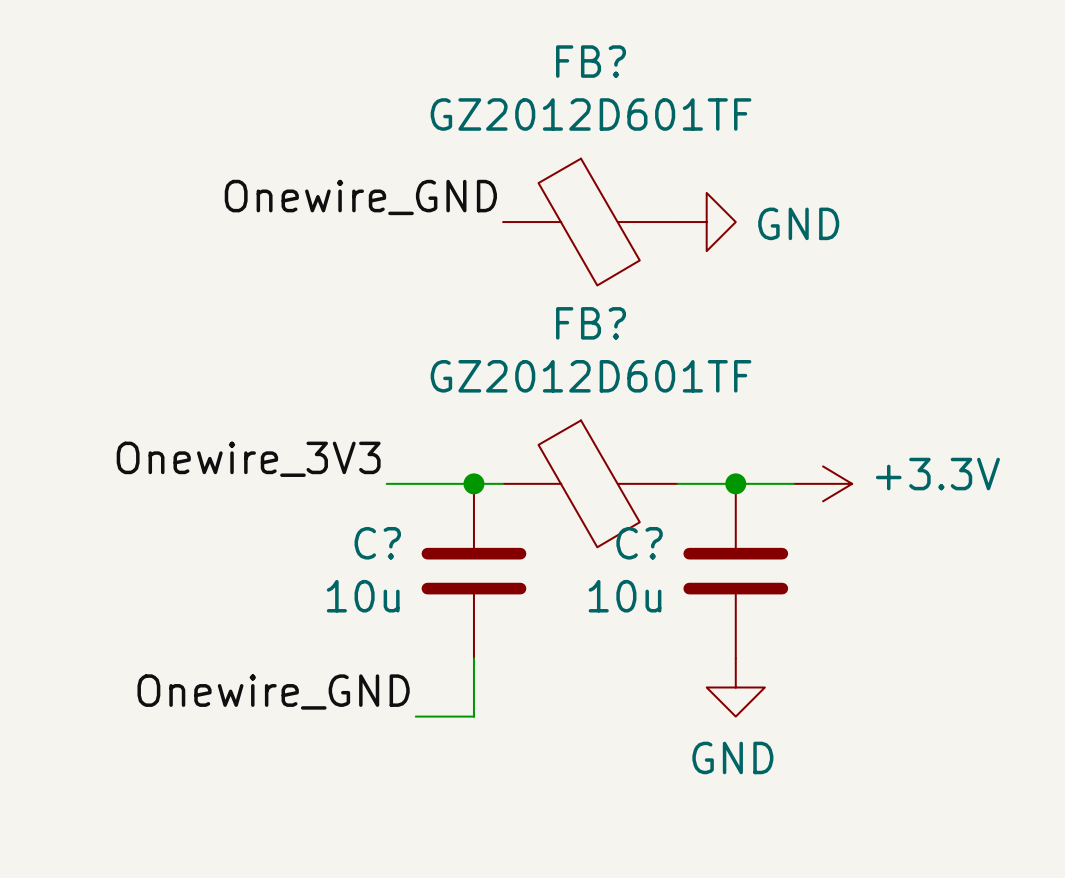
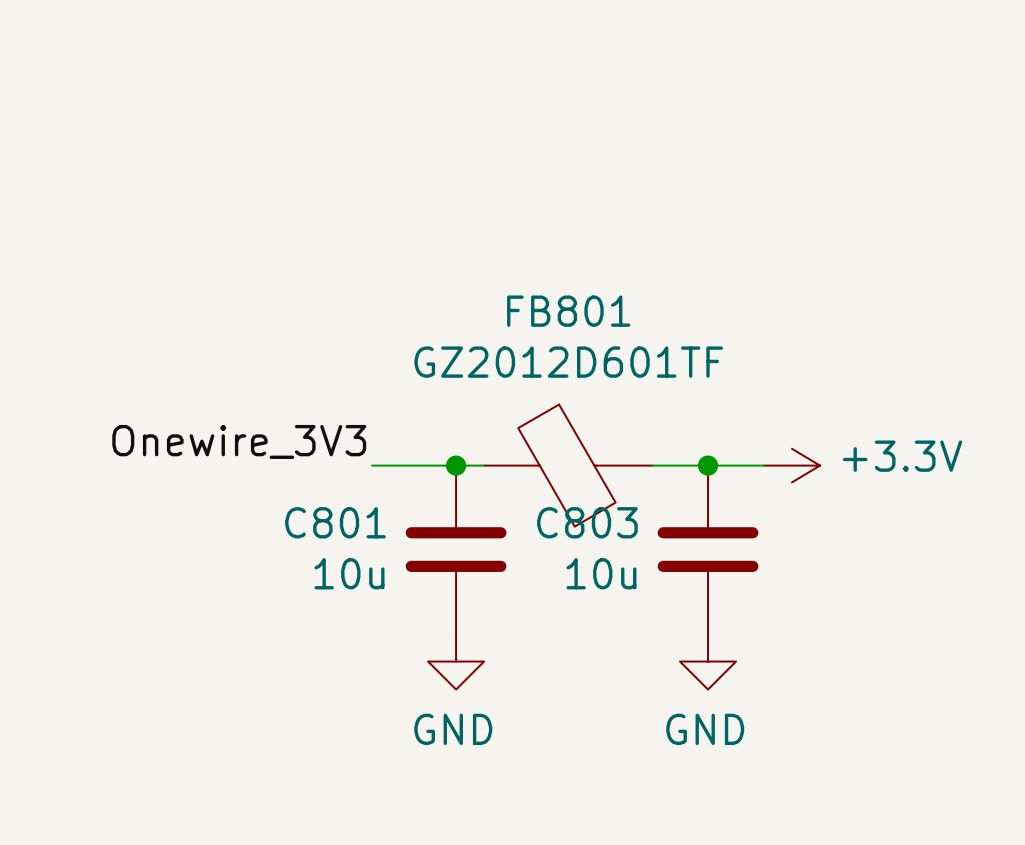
label: Onewire_GND (360, 197) -> none
FB?: GZ2012D601TF (590, 222) -> none
power symbol rotation: 0° (706, 222) -> 90° clockwise (456, 661)
power symbol position: GND (706, 222) -> GND (456, 661)
FB? name: FB? (591, 323) -> FB801 (568, 311)
C? name: C? (377, 543) -> C801 (335, 522)
C? name: C? (639, 543) -> C803 (587, 522)
wire: (473, 658) (473, 716) (415, 716) -> none
label: Onewire_GND (273, 692) -> none

